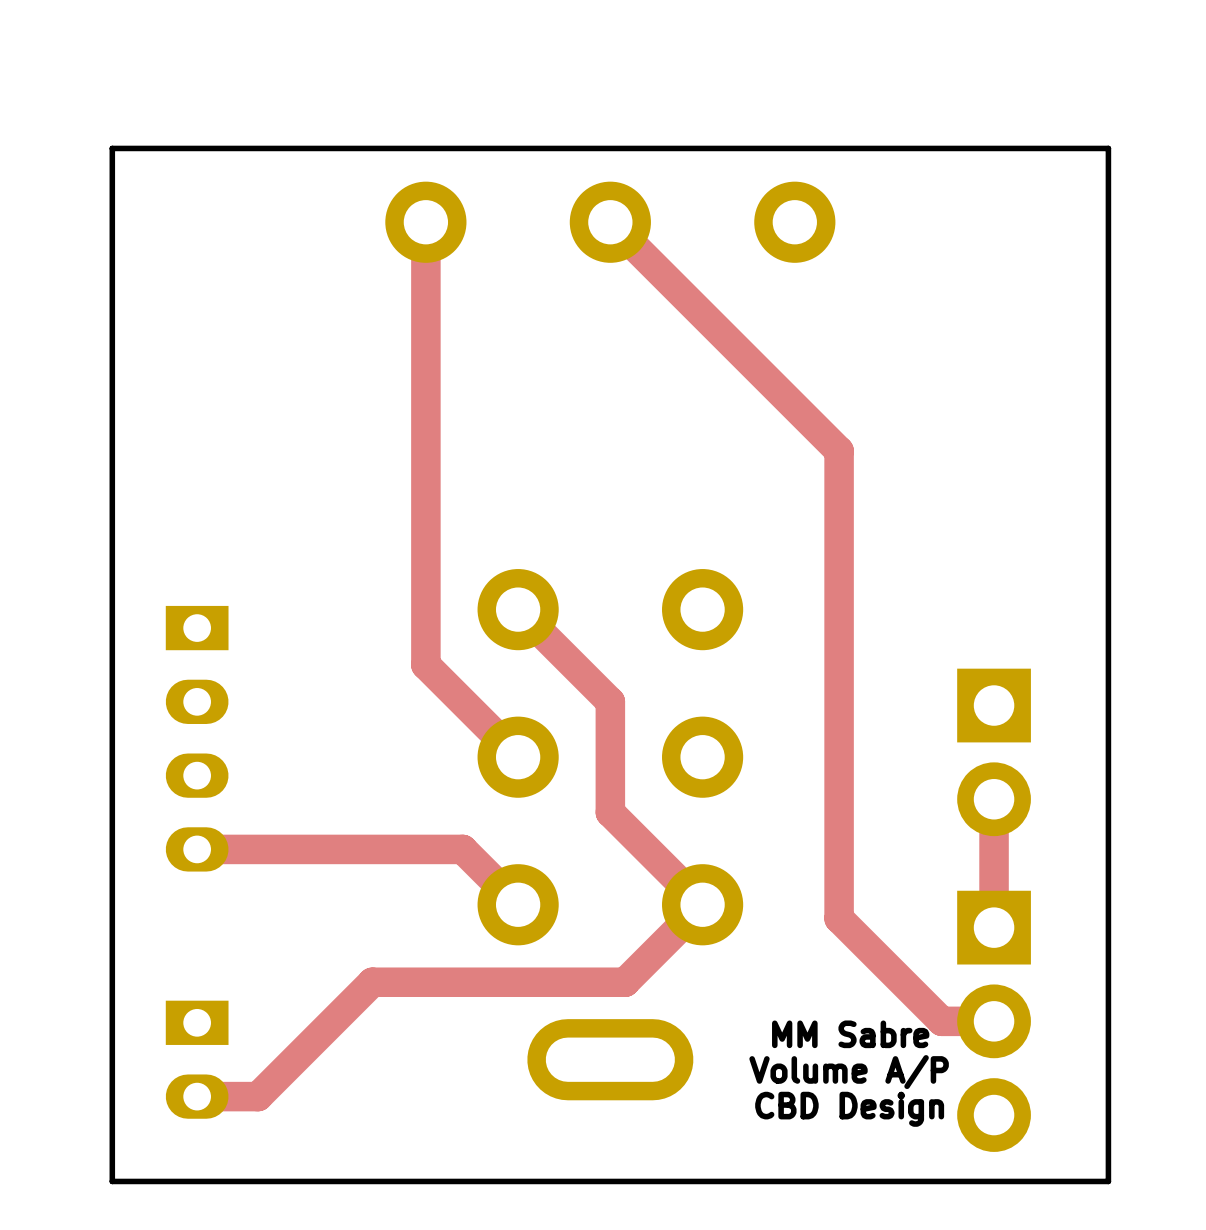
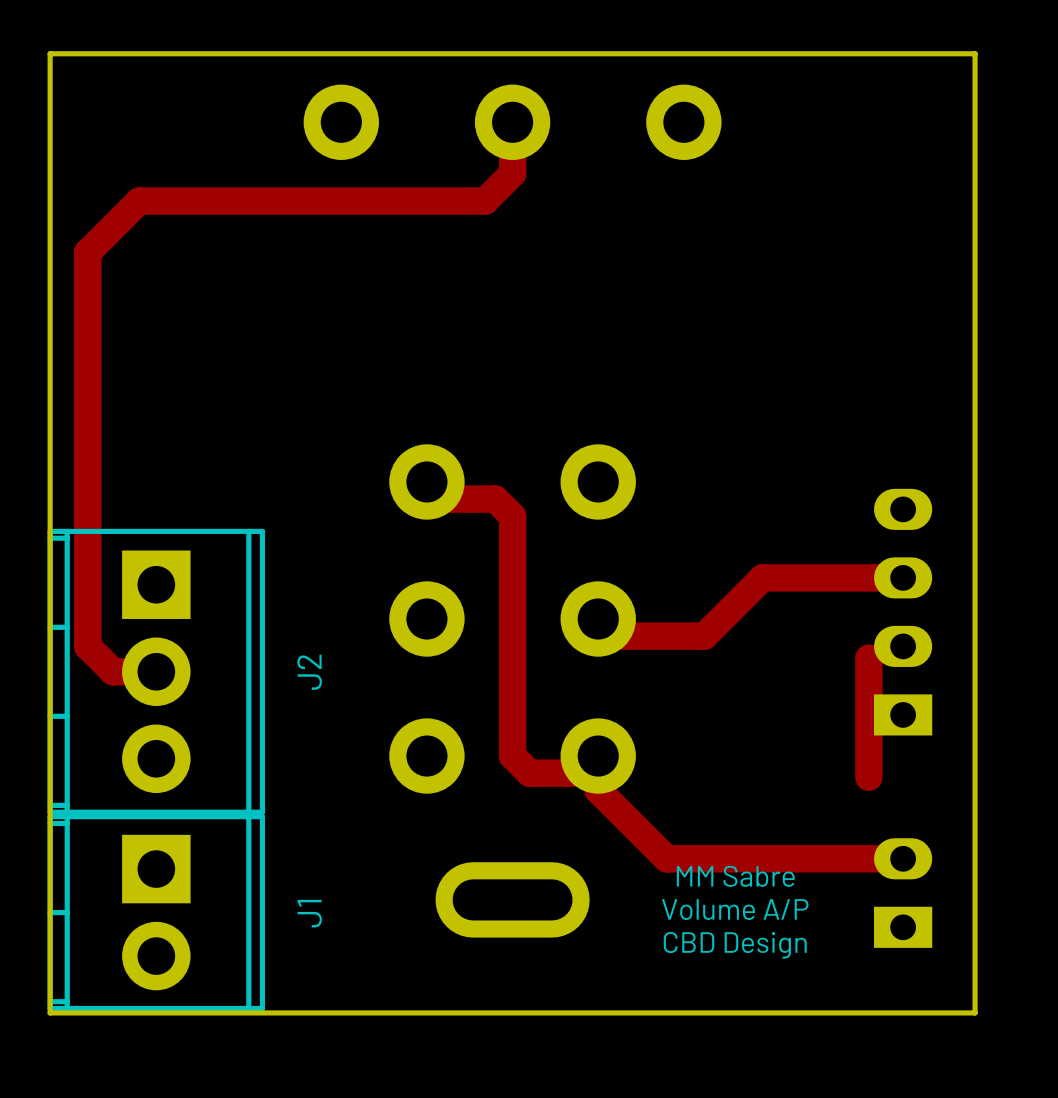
track: (425, 222) (425, 664) (518, 757) -> none
track: (610, 222) (839, 450) (839, 918) (941, 1021) (994, 1021) -> (512, 122) (512, 173) (485, 201) (139, 201) (87, 252) (87, 646) (113, 671) (156, 671)
track: (518, 609) (610, 701) -> (426, 499) (495, 499) (512, 516) (512, 567)
track: none -> (896, 577) (762, 577) (704, 636) (598, 636)
part rotation: 0° (197, 738) -> 180° (903, 612)
part position: (197, 738) -> (903, 612)
J1 side: bottom (994, 752) -> top (156, 912)
track: (610, 812) (702, 904) (625, 982) (372, 982) (258, 1096) (197, 1096) -> (512, 670) (512, 756) (529, 773) (598, 773) (598, 790) (666, 858) (896, 858)
track: (197, 849) (462, 849) (518, 904) -> none
J2 side: bottom (994, 1021) -> top (156, 671)
part rotation: 0° (197, 1059) -> 180° (903, 893)
part position: (197, 1059) -> (903, 893)

